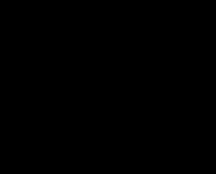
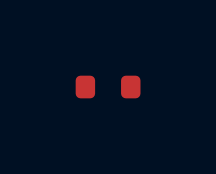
part: none -> (108, 87)

